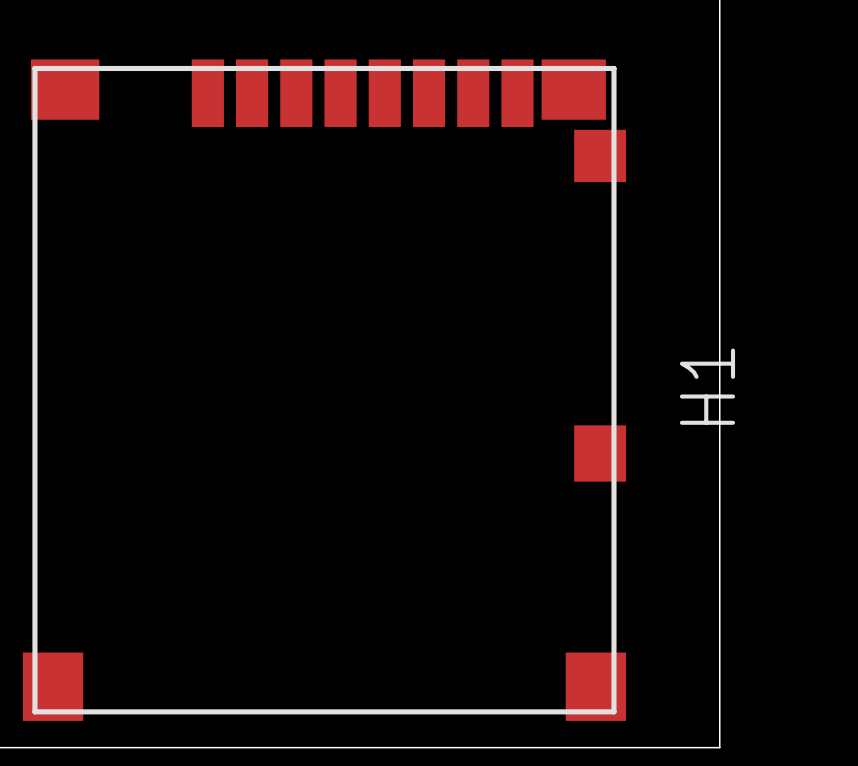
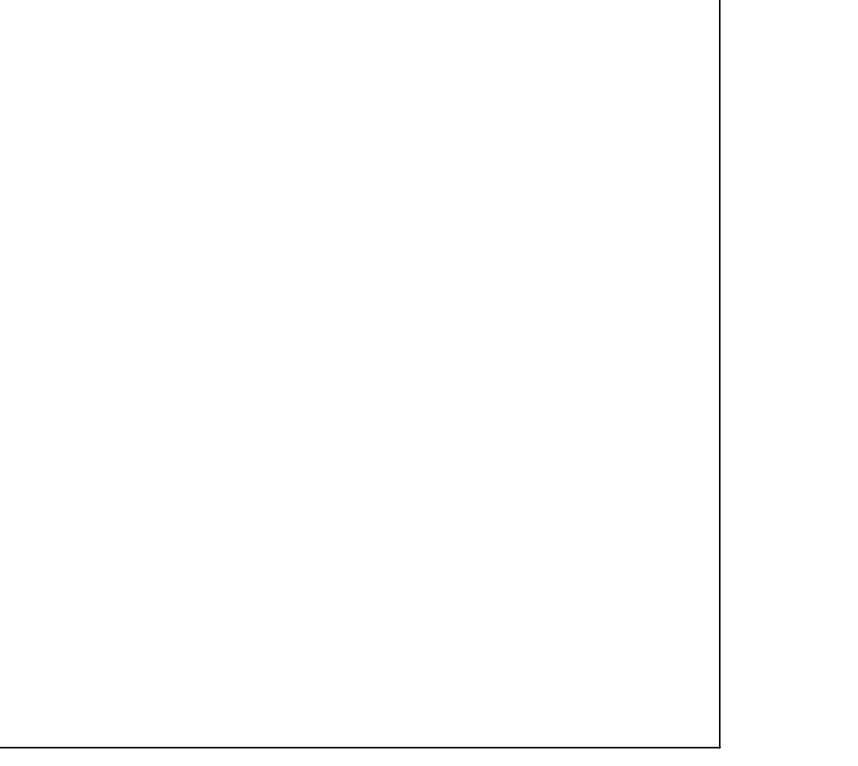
H1: (324, 390) -> none

